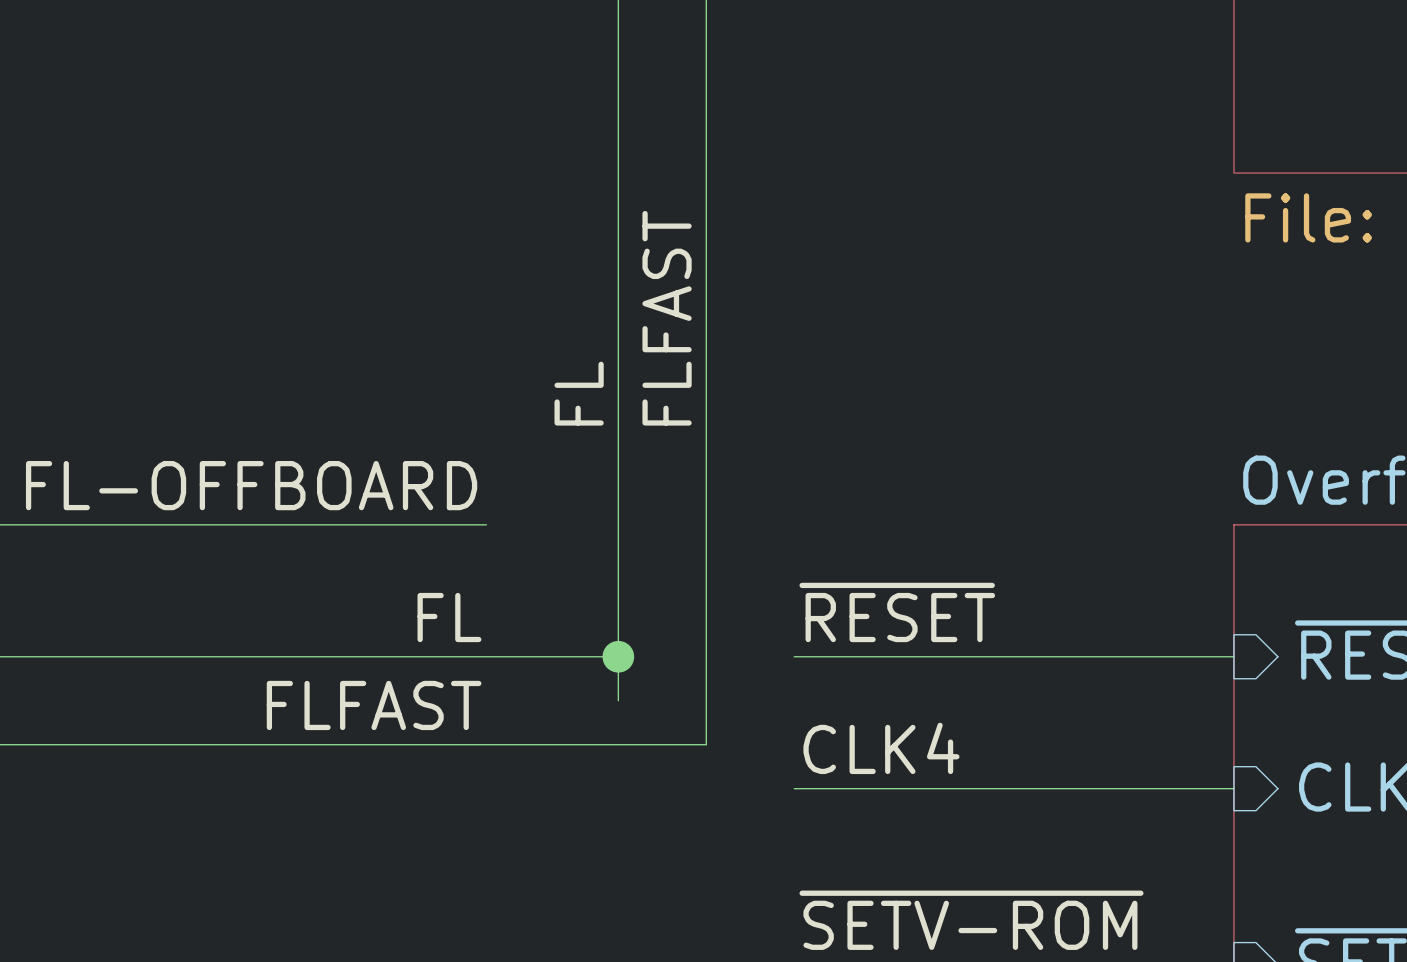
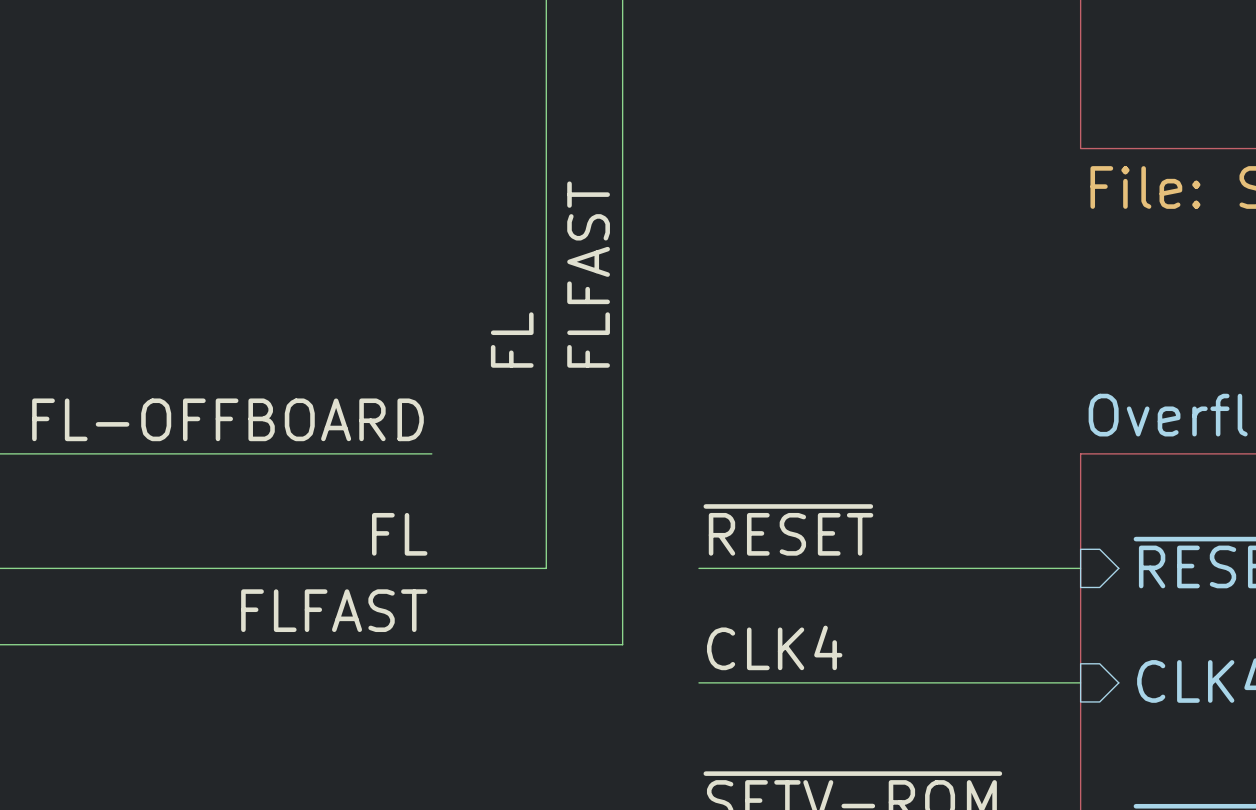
wire: (618, 656) (618, 700) -> none
junction: (618, 656) -> none

